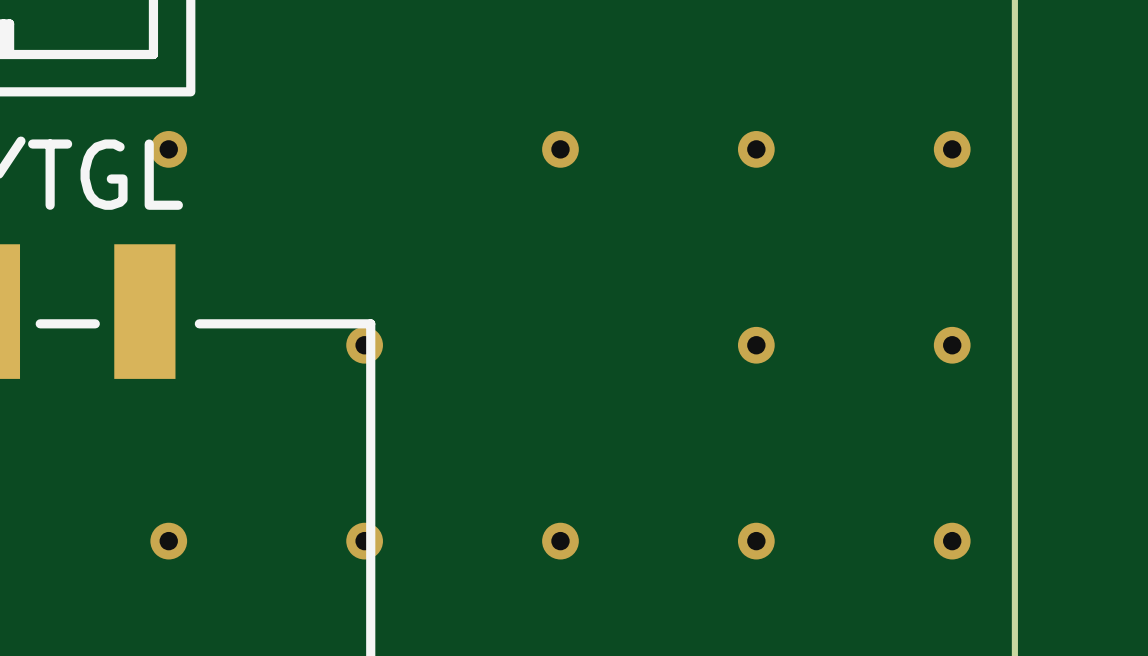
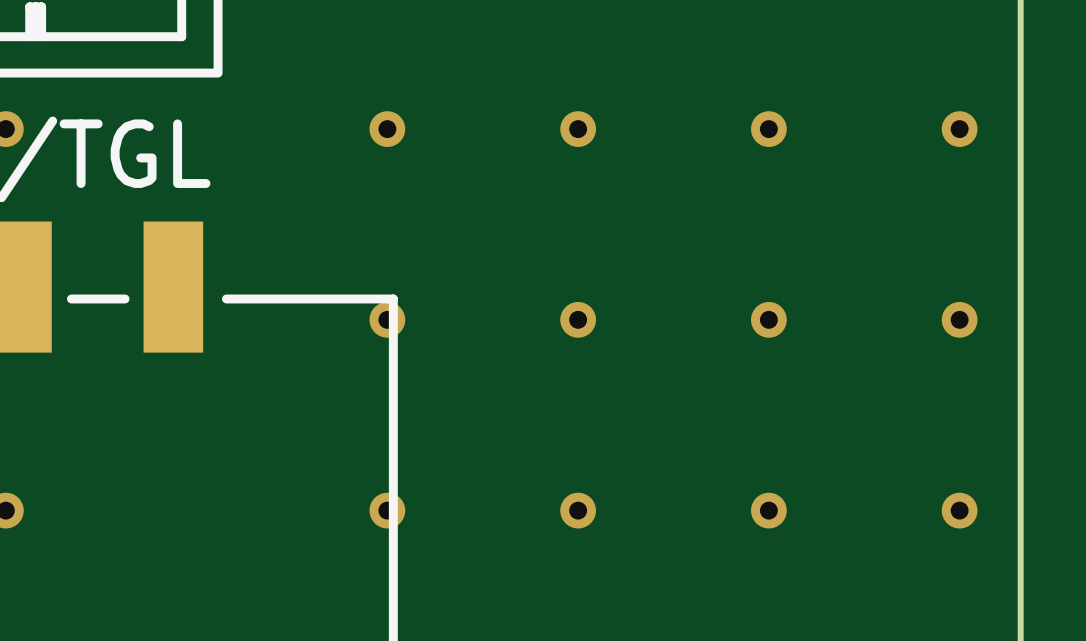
via position: (168, 149) -> (387, 129)
via: none -> (578, 319)
via: (168, 541) -> none

